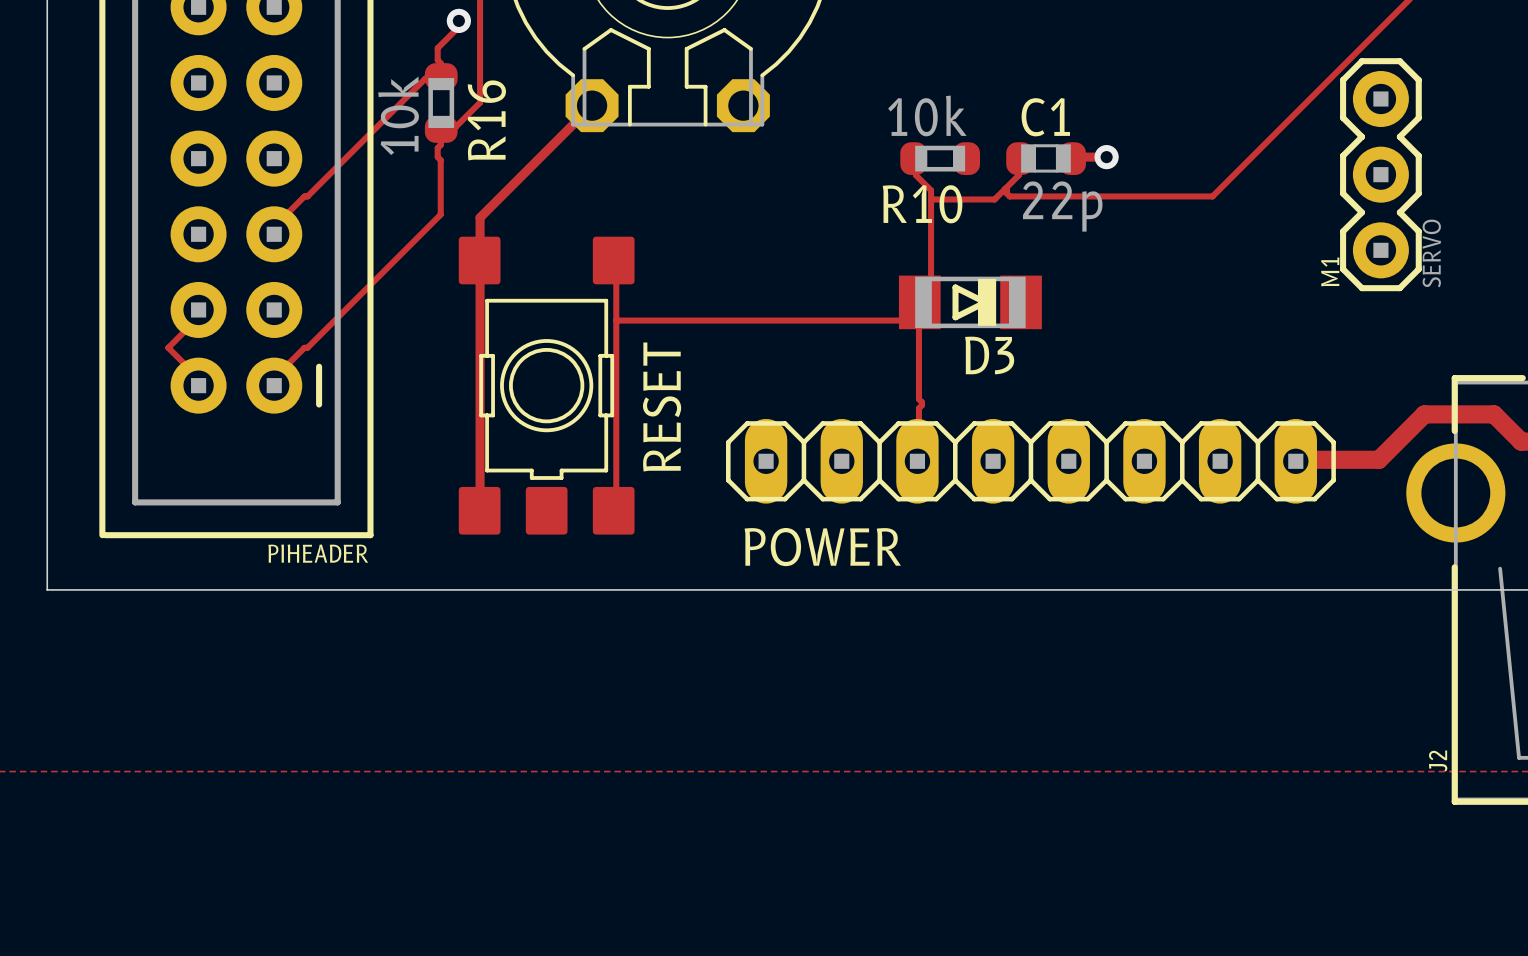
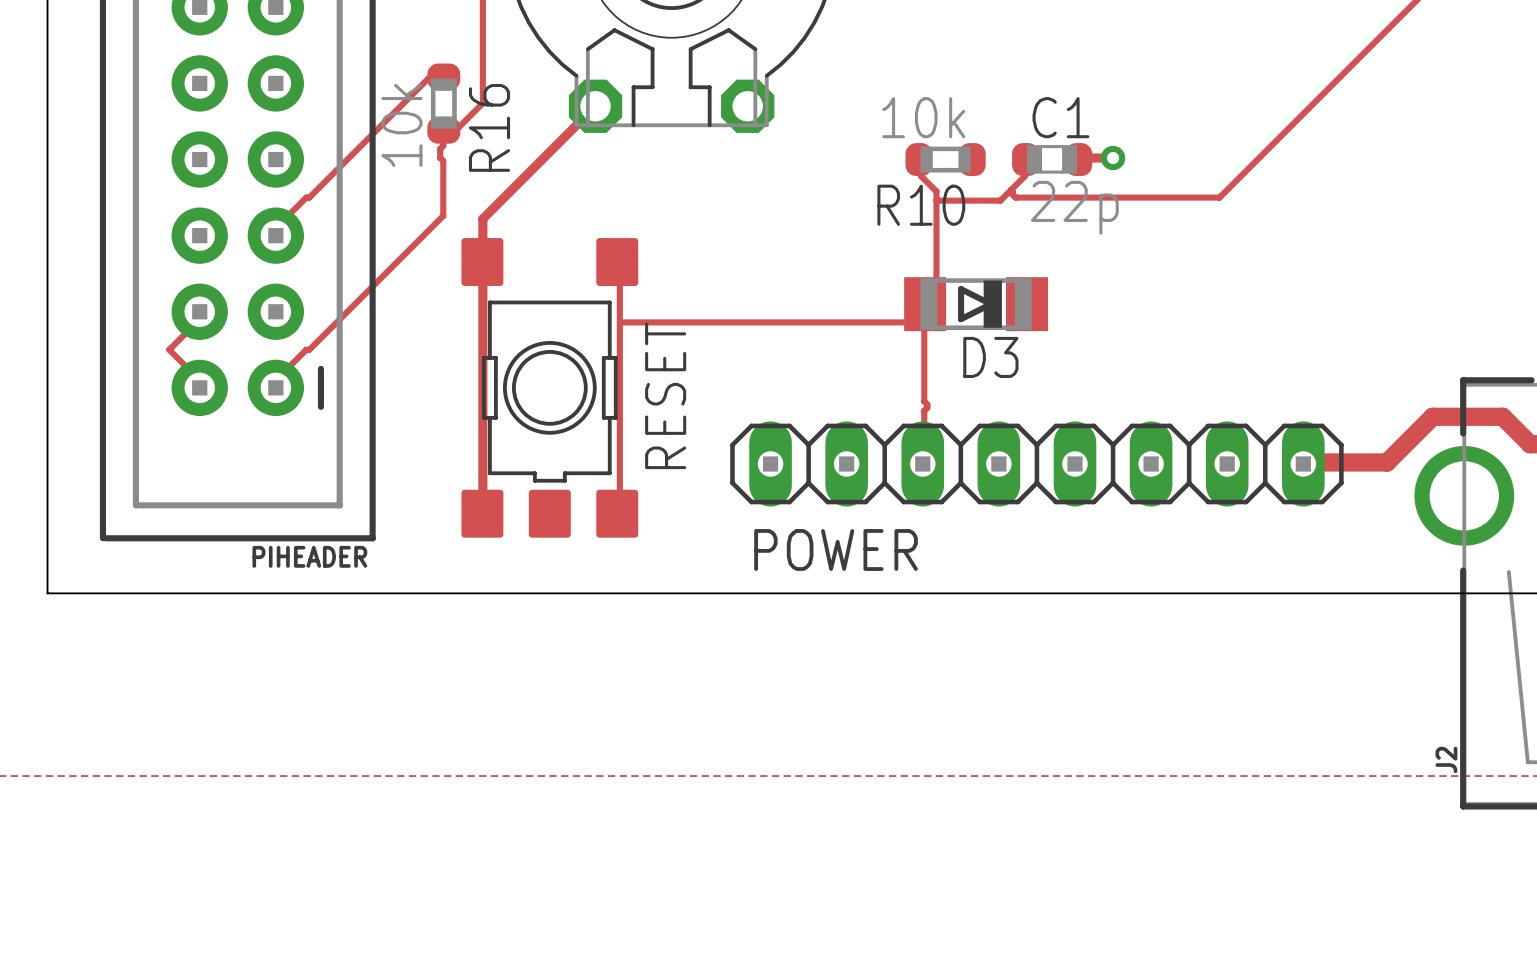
track: (458, 20) (458, 26) (437, 48) (437, 60) (440, 63) (441, 76) -> none
via: (458, 20) -> none
M1: SERVO (1380, 174) -> none

